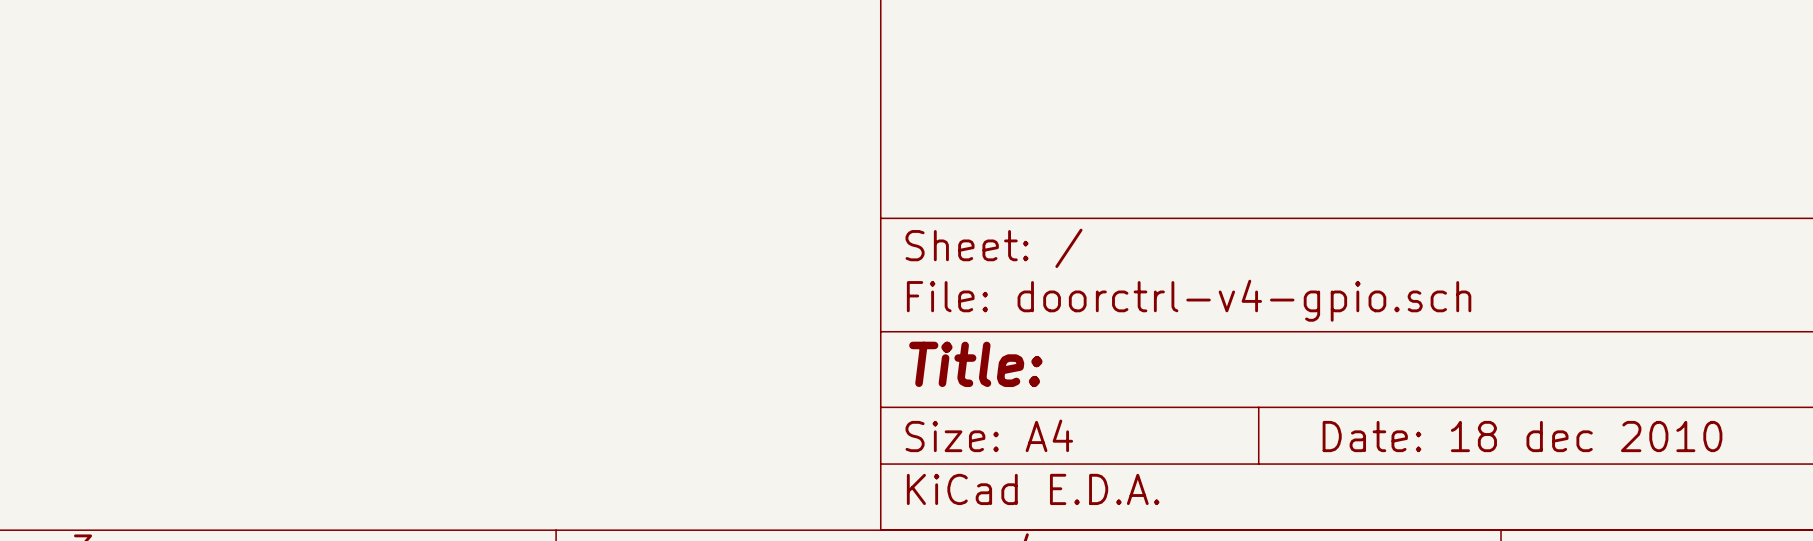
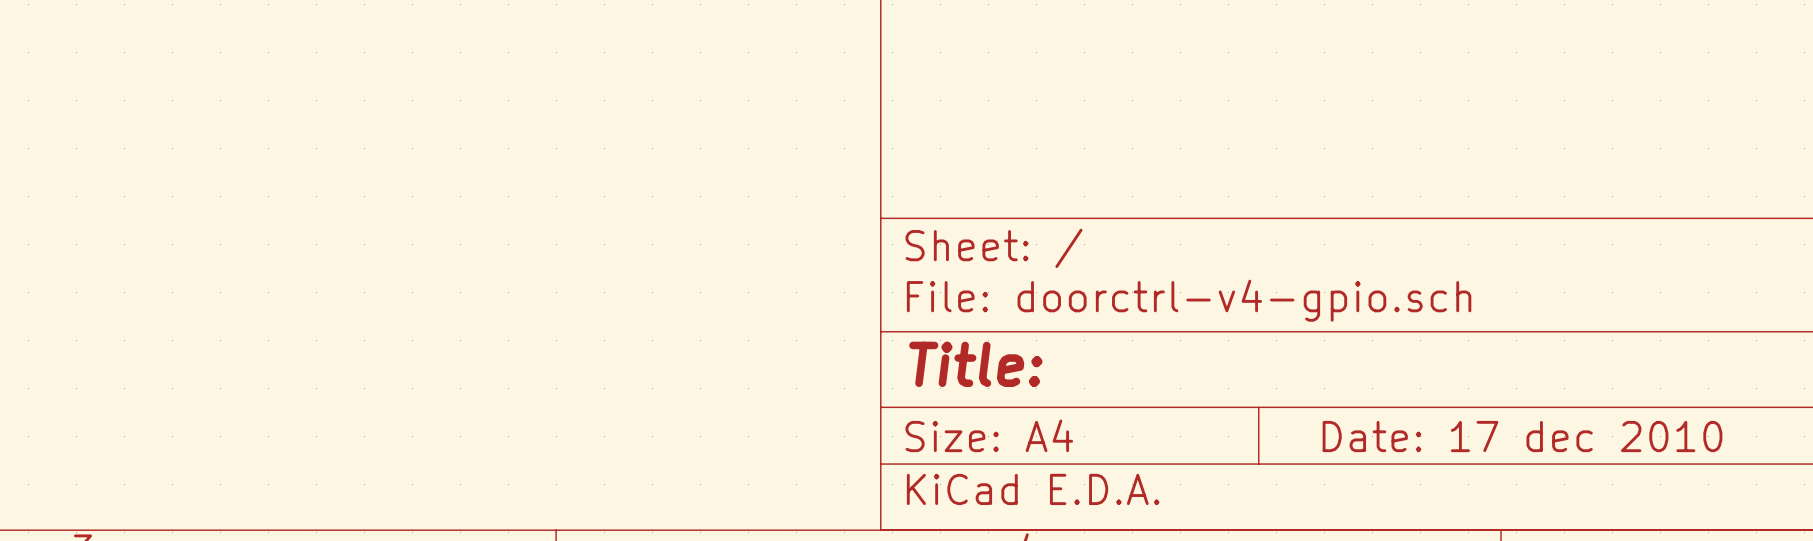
title block: Date: 18 dec 2010 (1522, 436) -> Date: 17 dec 2010 (1522, 436)

